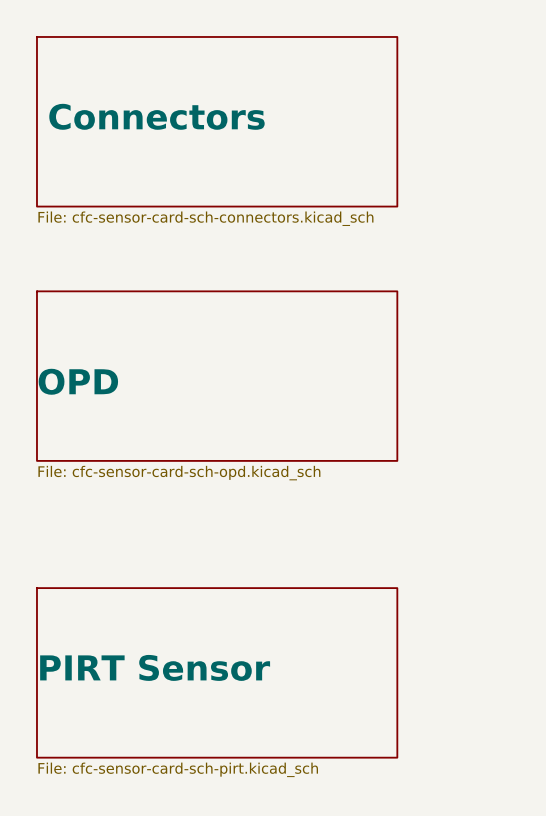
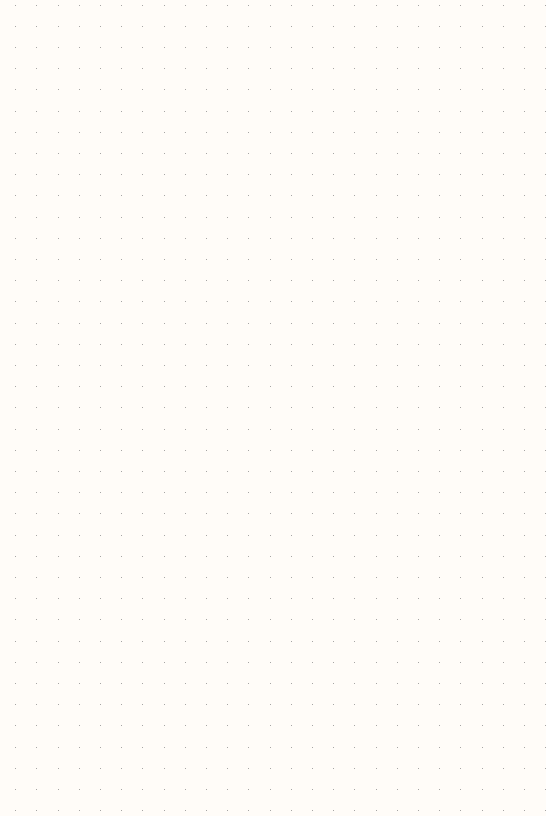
sheet Connectors: File: cfc-sensor-card-sch-connectors.kicad_sch (217, 121) -> none
sheet OPD: File: cfc-sensor-card-sch-opd.kicad_sch (217, 376) -> none
sheet PIRT Sensor: File: cfc-sensor-card-sch-pirt.kicad_sch (217, 672) -> none

